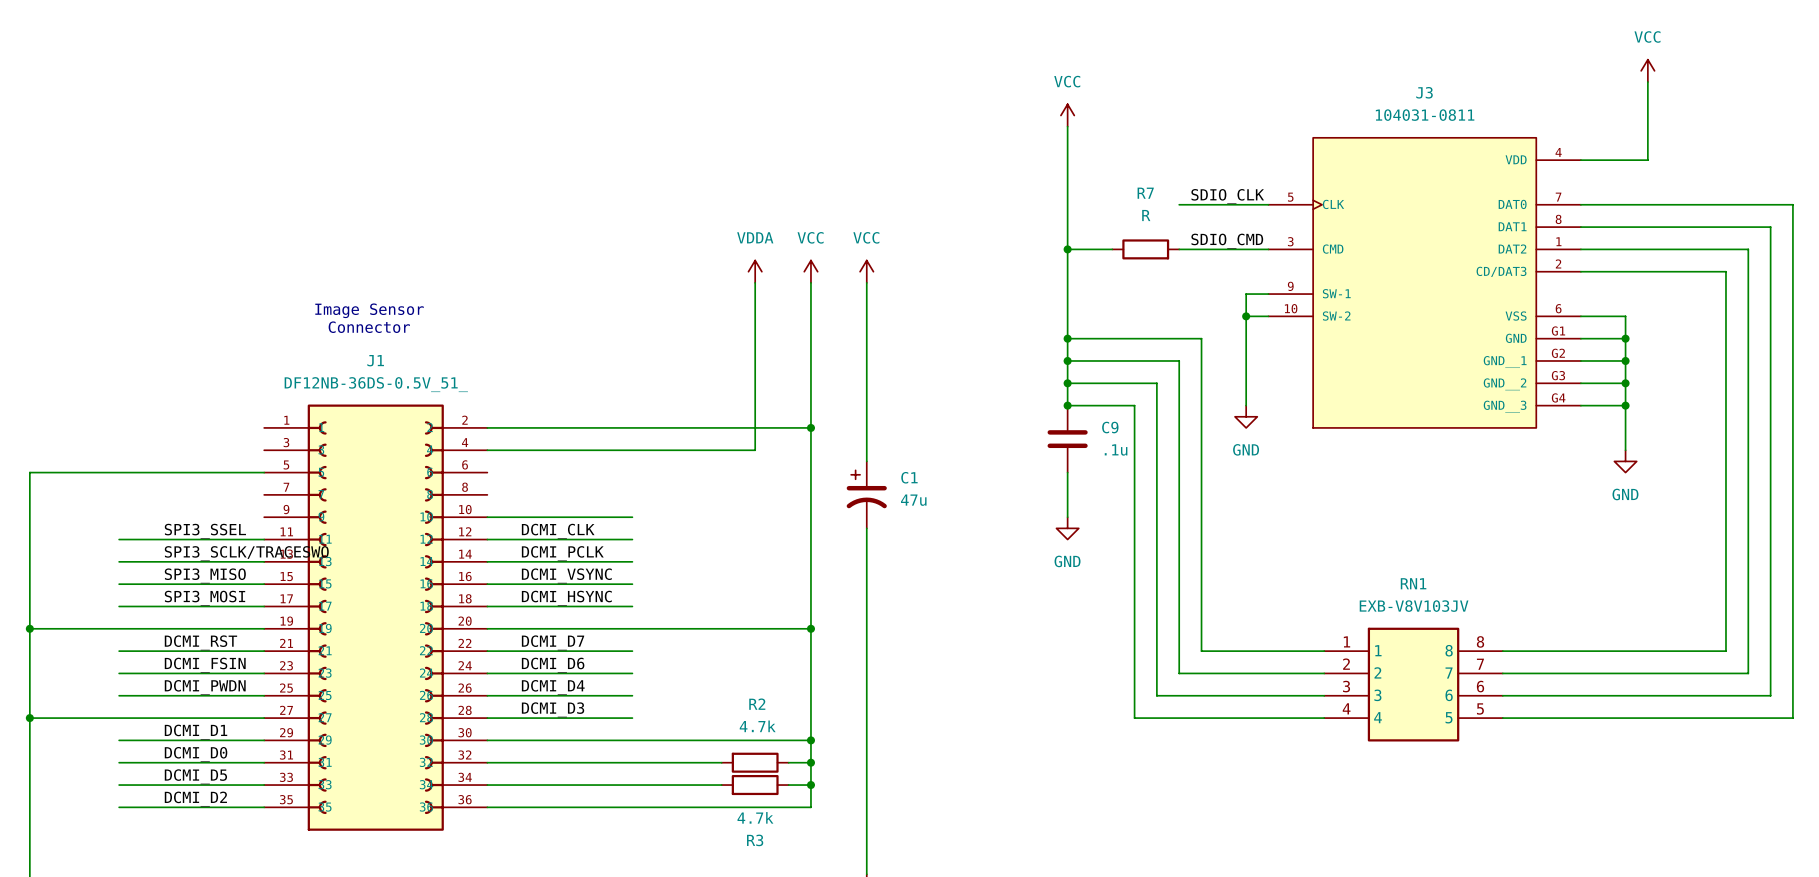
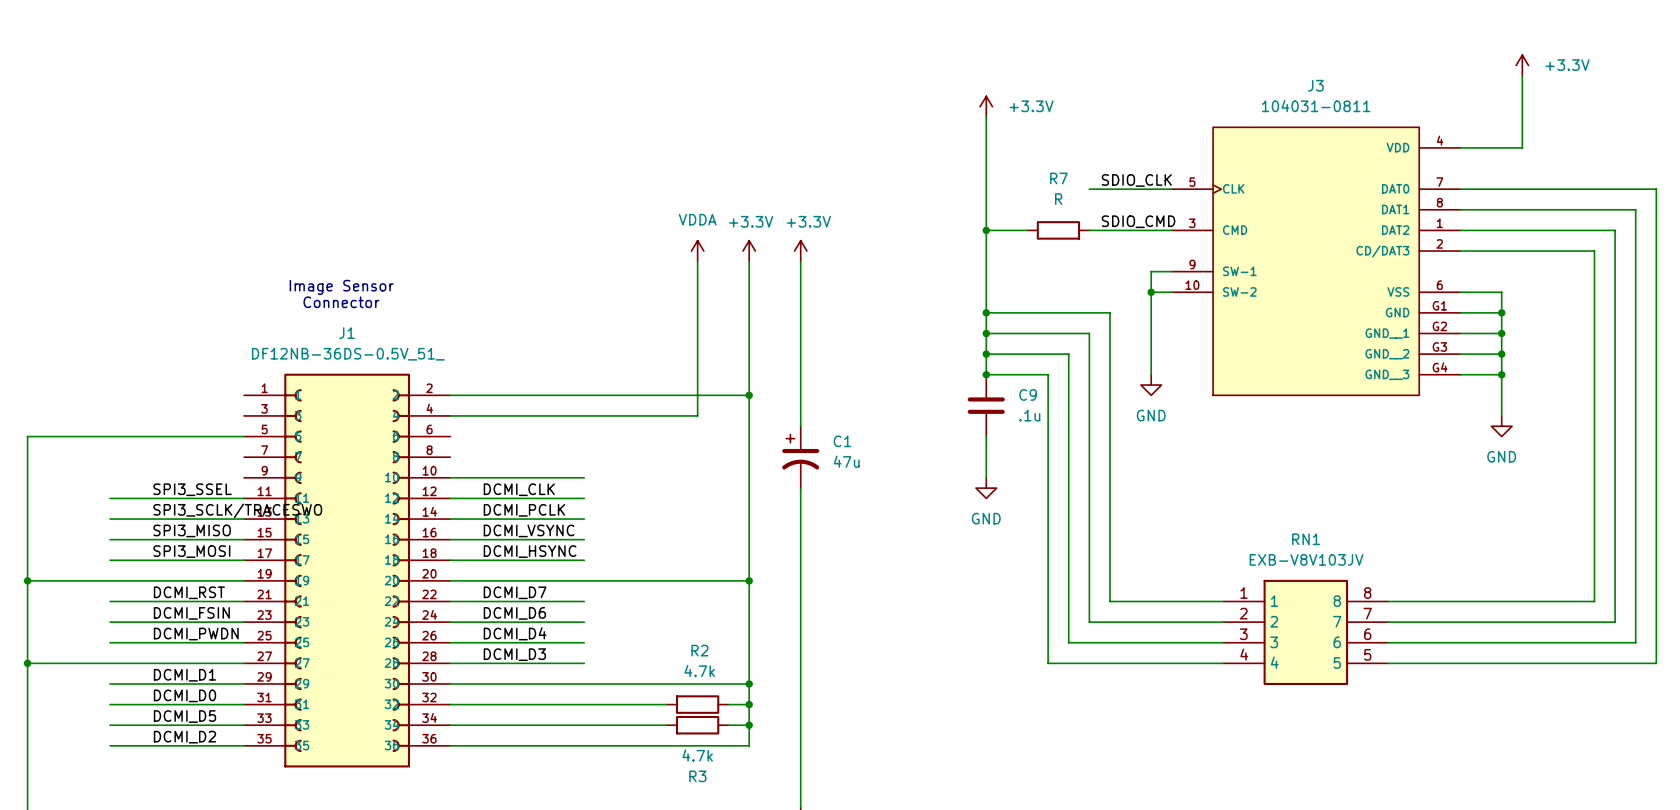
power symbol: VCC (1647, 70) -> +3.3V (1522, 65)
power symbol: VCC (1067, 115) -> +3.3V (986, 106)
power symbol: VCC (810, 271) -> +3.3V (749, 251)
power symbol: VCC (866, 271) -> +3.3V (800, 251)

